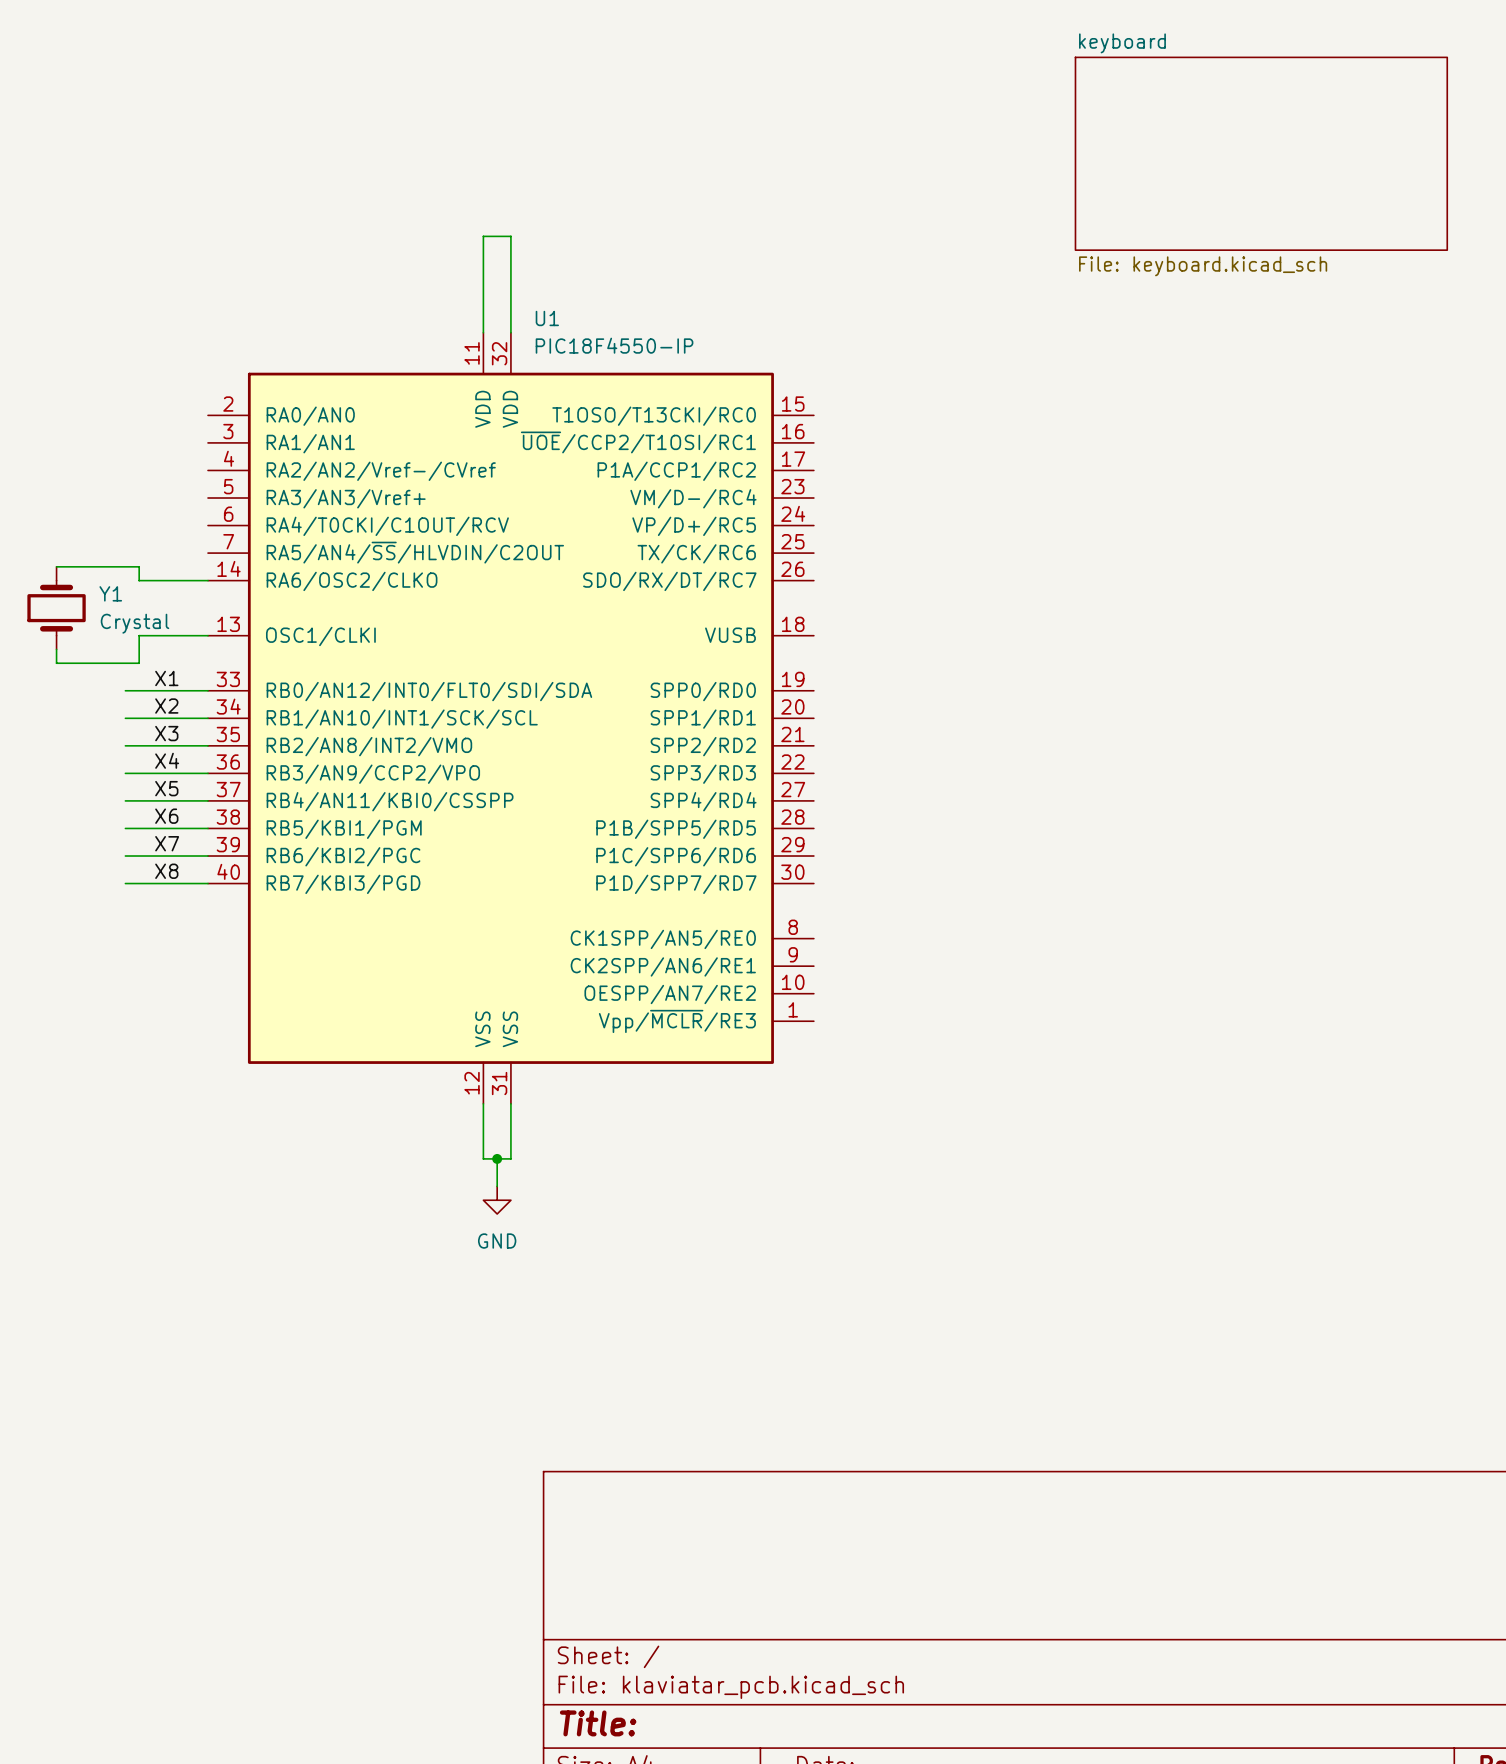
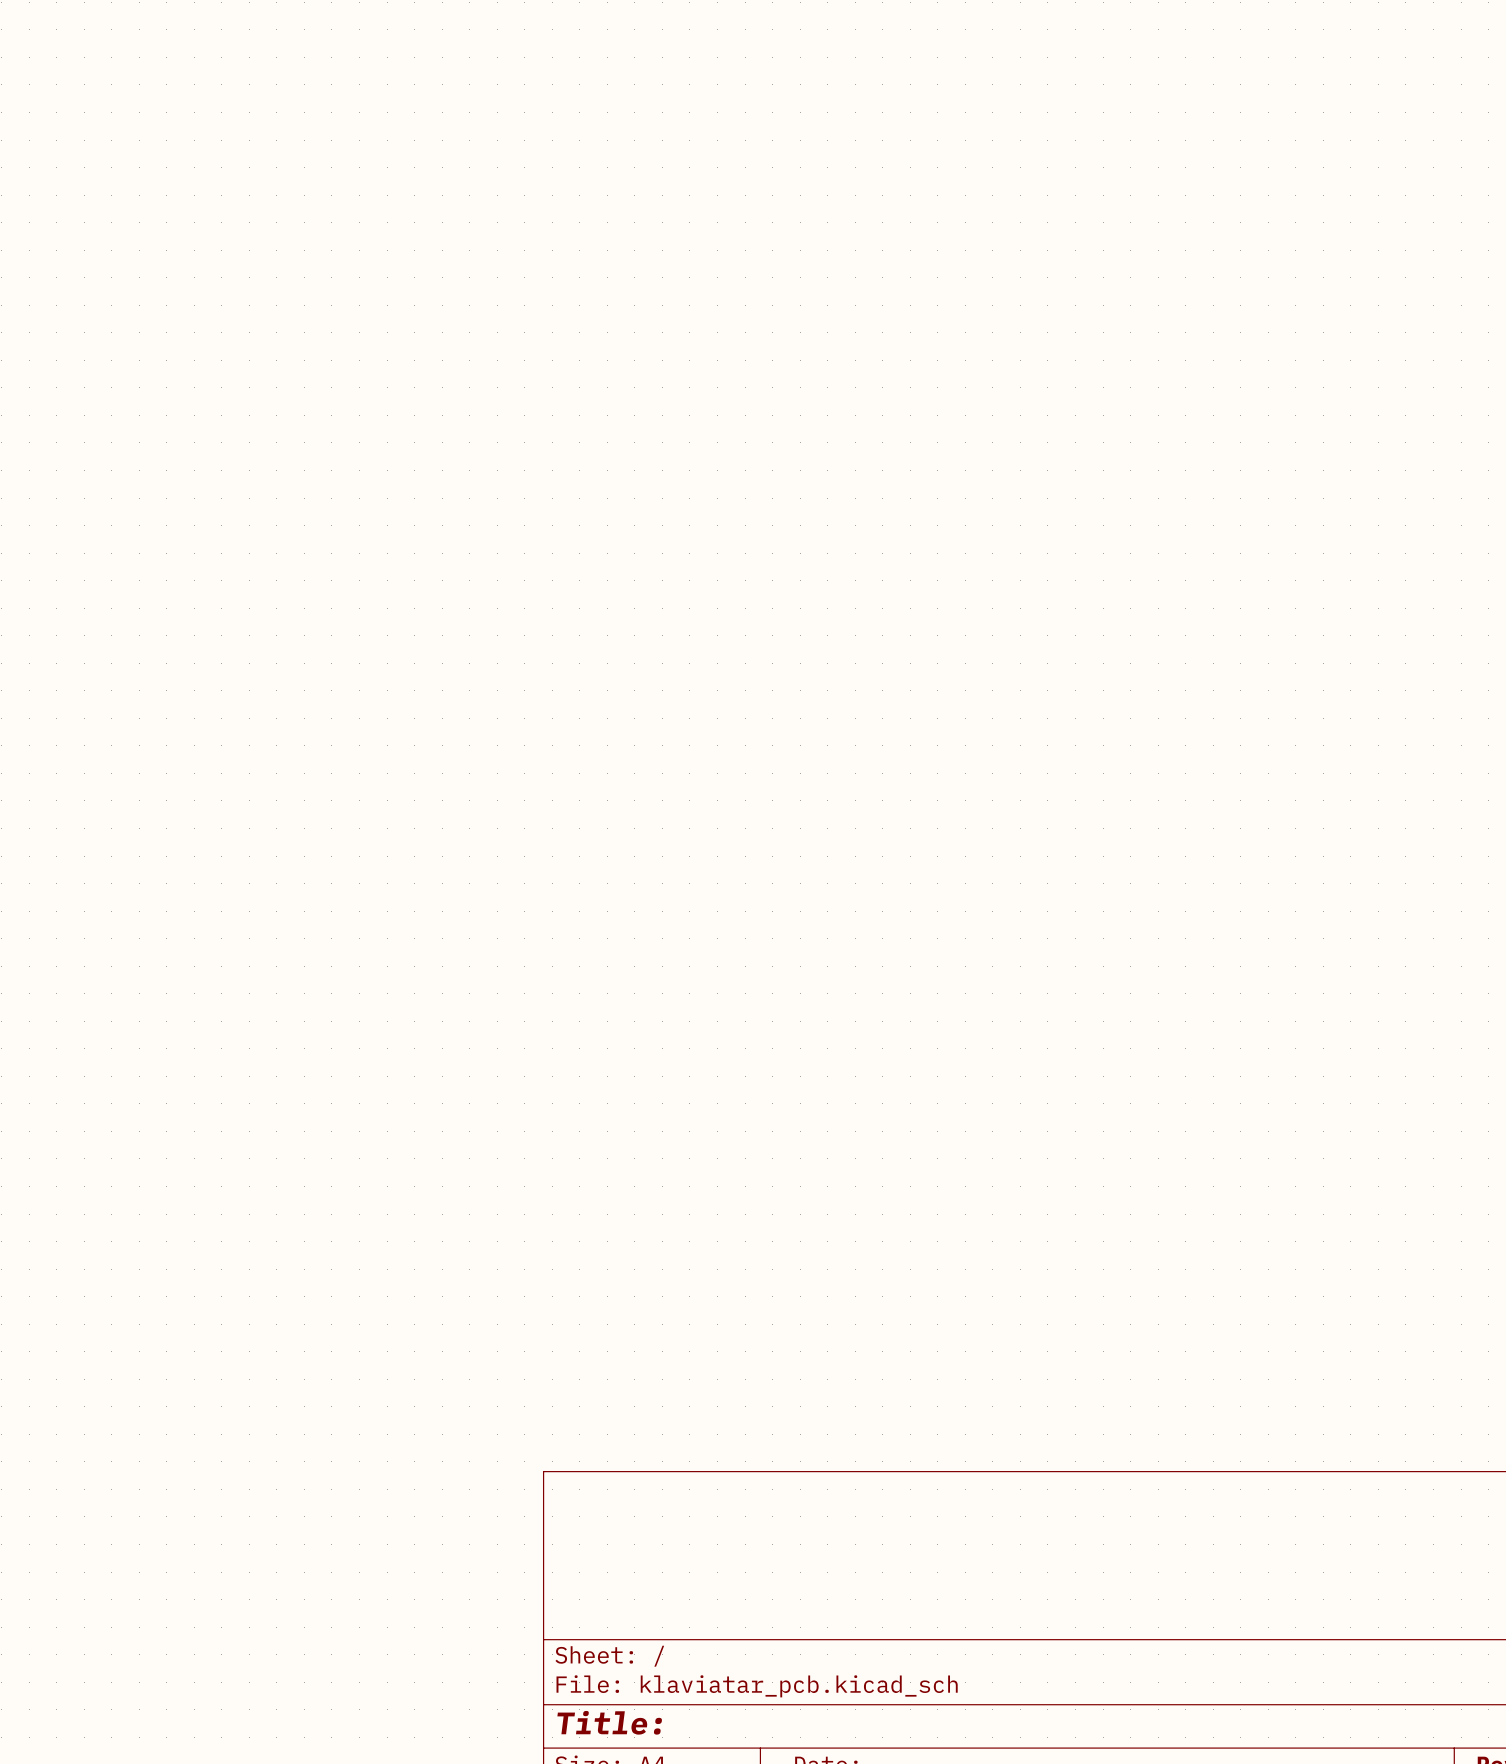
sheet keyboard: File: keyboard.kicad_sch (1261, 153) -> none
wire: (483, 332) (483, 236) (510, 236) (510, 332) -> none
wire: (56, 566) (139, 566) (139, 580) (208, 580) -> none
Y1: Crystal (56, 608) -> none
wire: (208, 635) (139, 635) (139, 663) (56, 663) (56, 649) -> none
label: X1 (166, 678) -> none
wire: (125, 690) (208, 690) -> none
label: X2 (166, 706) -> none
wire: (125, 718) (208, 718) -> none
U1: PIC18F4550-IP (510, 718) -> none
label: X3 (166, 733) -> none
wire: (125, 745) (208, 745) -> none
label: X4 (167, 760) -> none
wire: (125, 773) (208, 773) -> none
label: X5 (166, 788) -> none
wire: (125, 800) (208, 800) -> none
label: X6 (166, 816) -> none
wire: (125, 828) (208, 828) -> none
label: X7 (167, 843) -> none
wire: (125, 856) (208, 856) -> none
label: X8 (166, 871) -> none
wire: (125, 883) (208, 883) -> none
wire: (483, 1103) (483, 1158) (510, 1158) (510, 1103) -> none
wire: (497, 1158) (497, 1186) -> none
junction: (497, 1158) -> none
power symbol: GND (497, 1200) -> none

